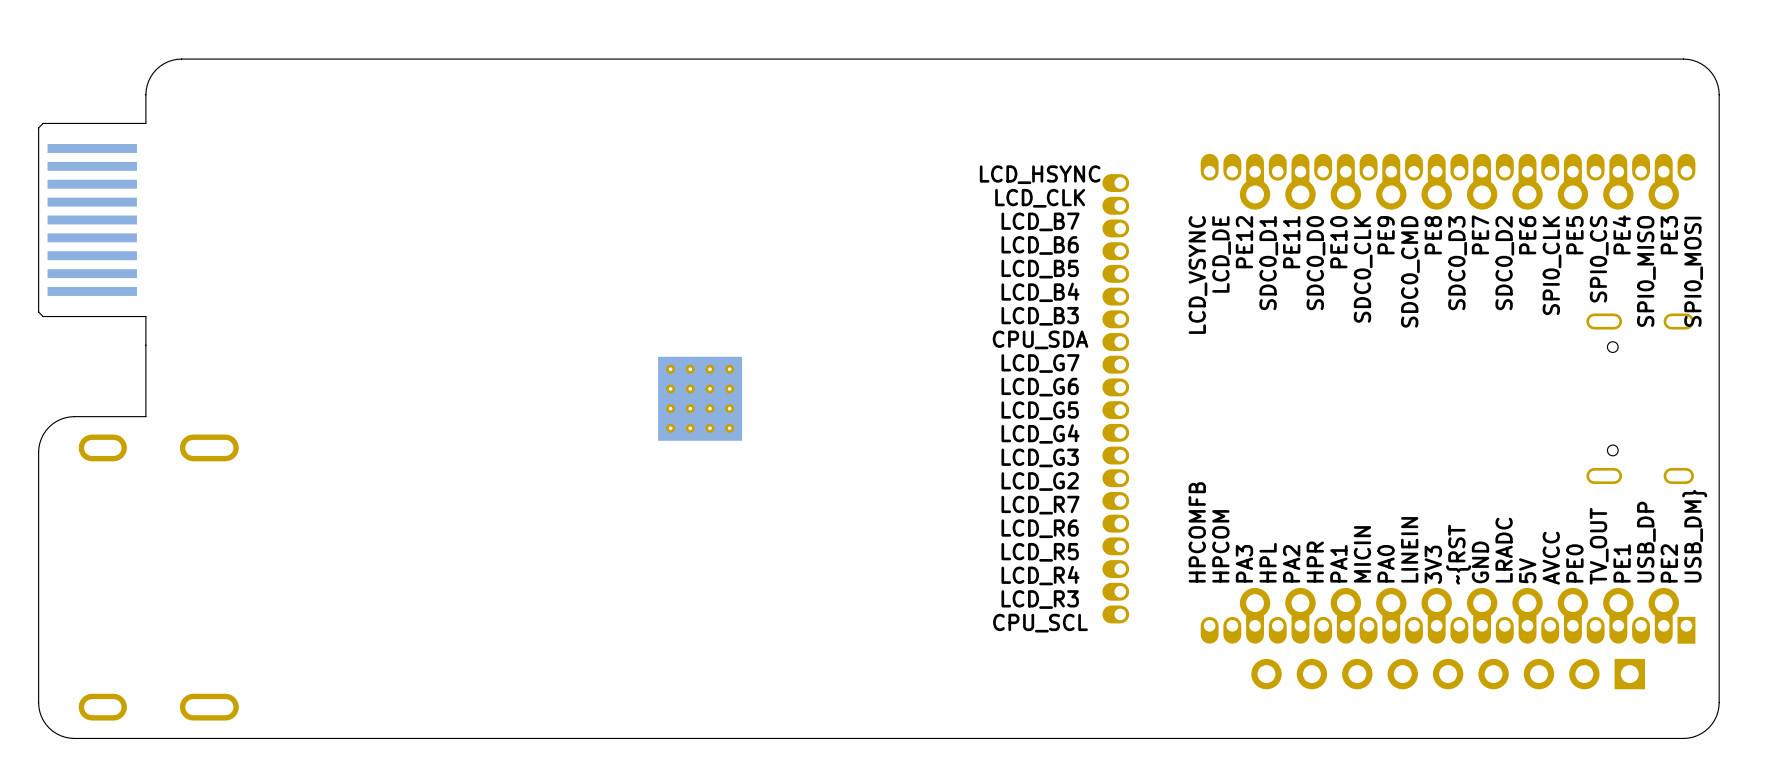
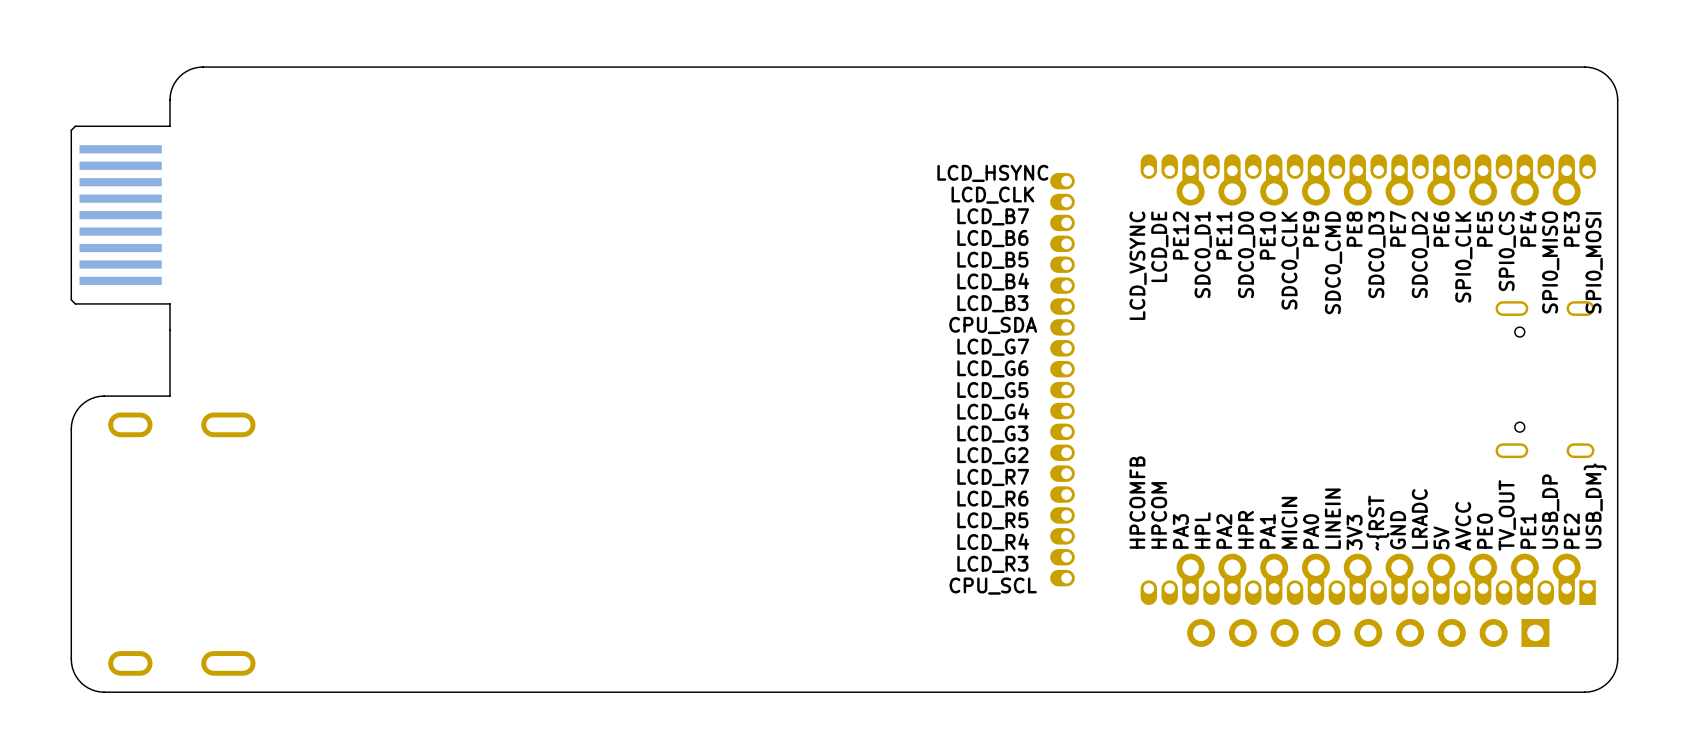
part: (700, 398) -> none

